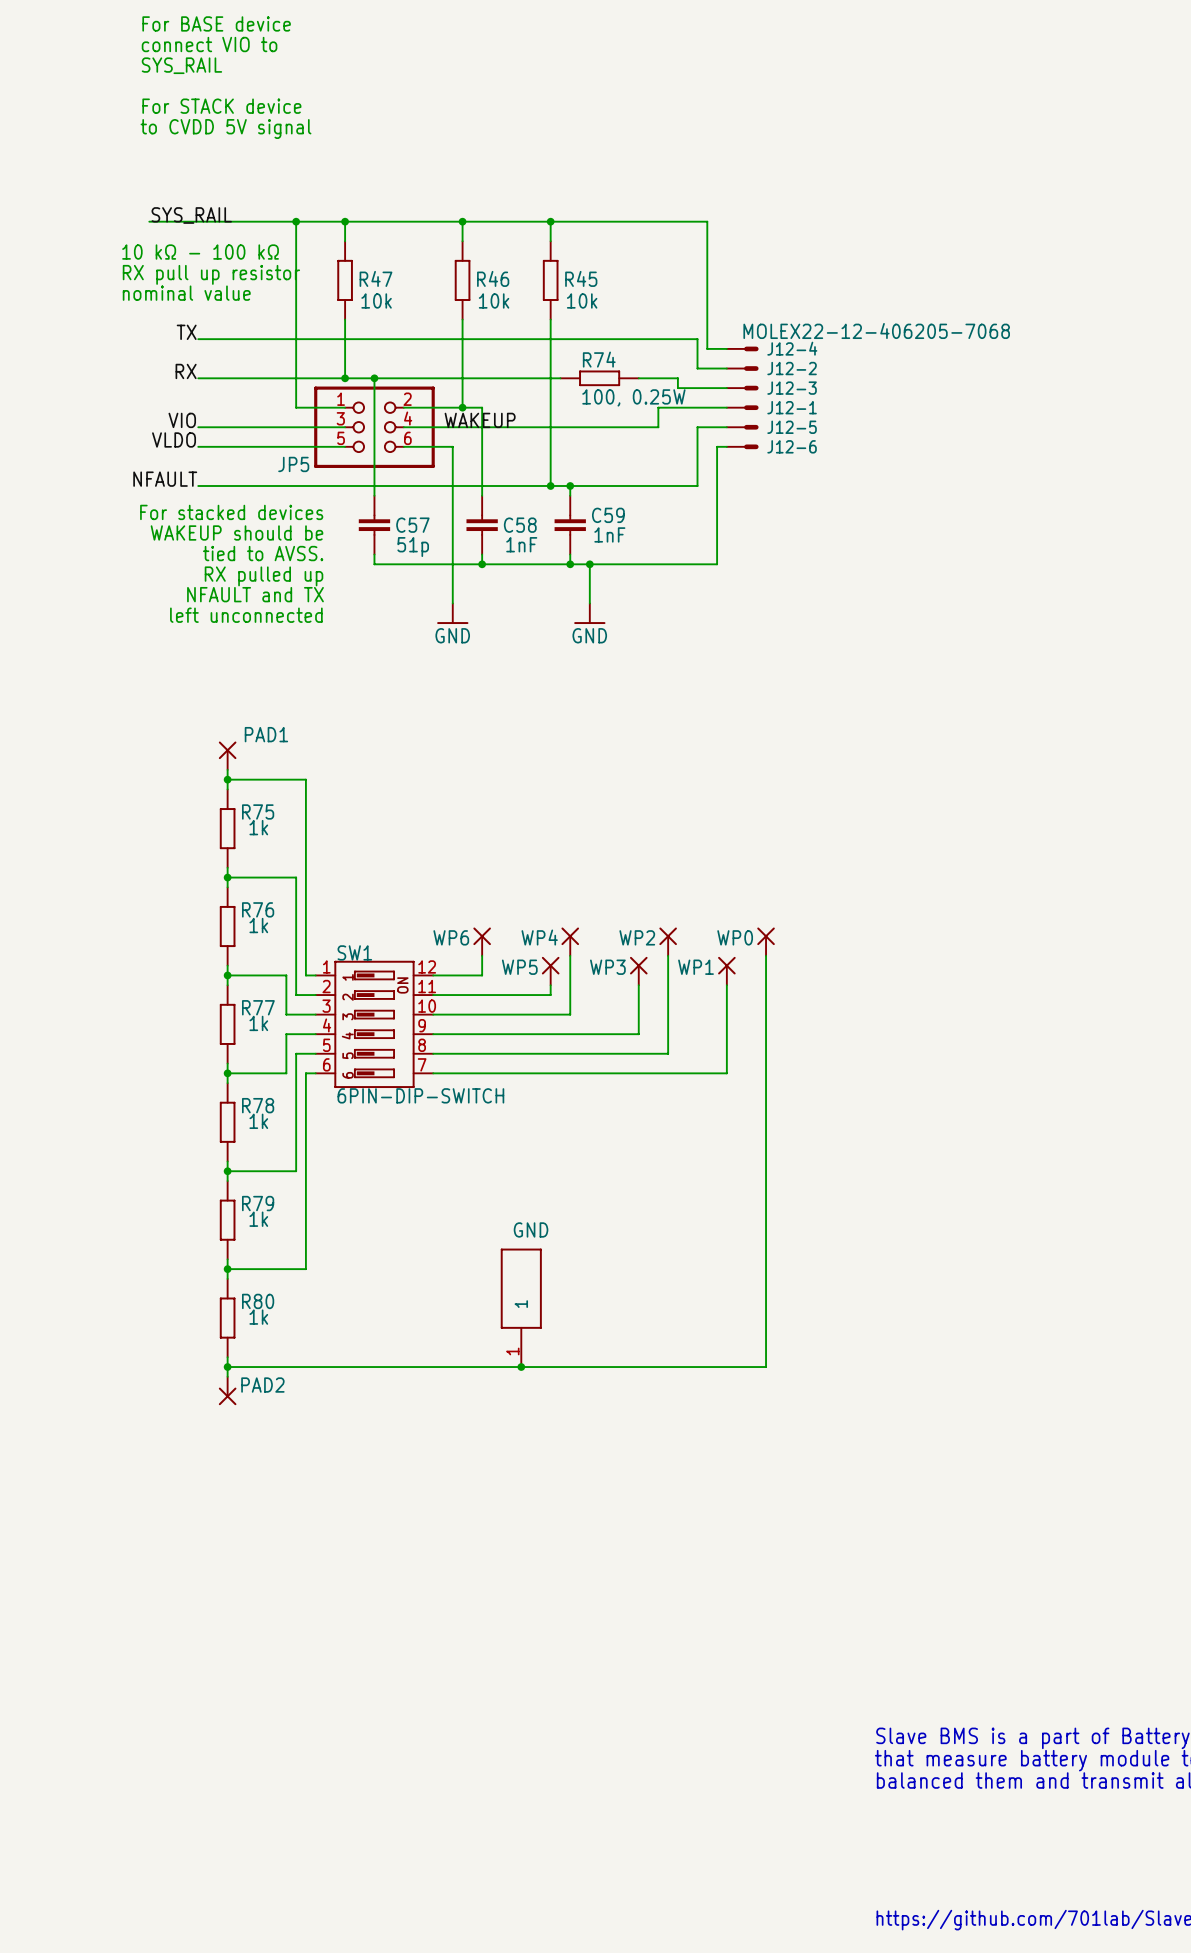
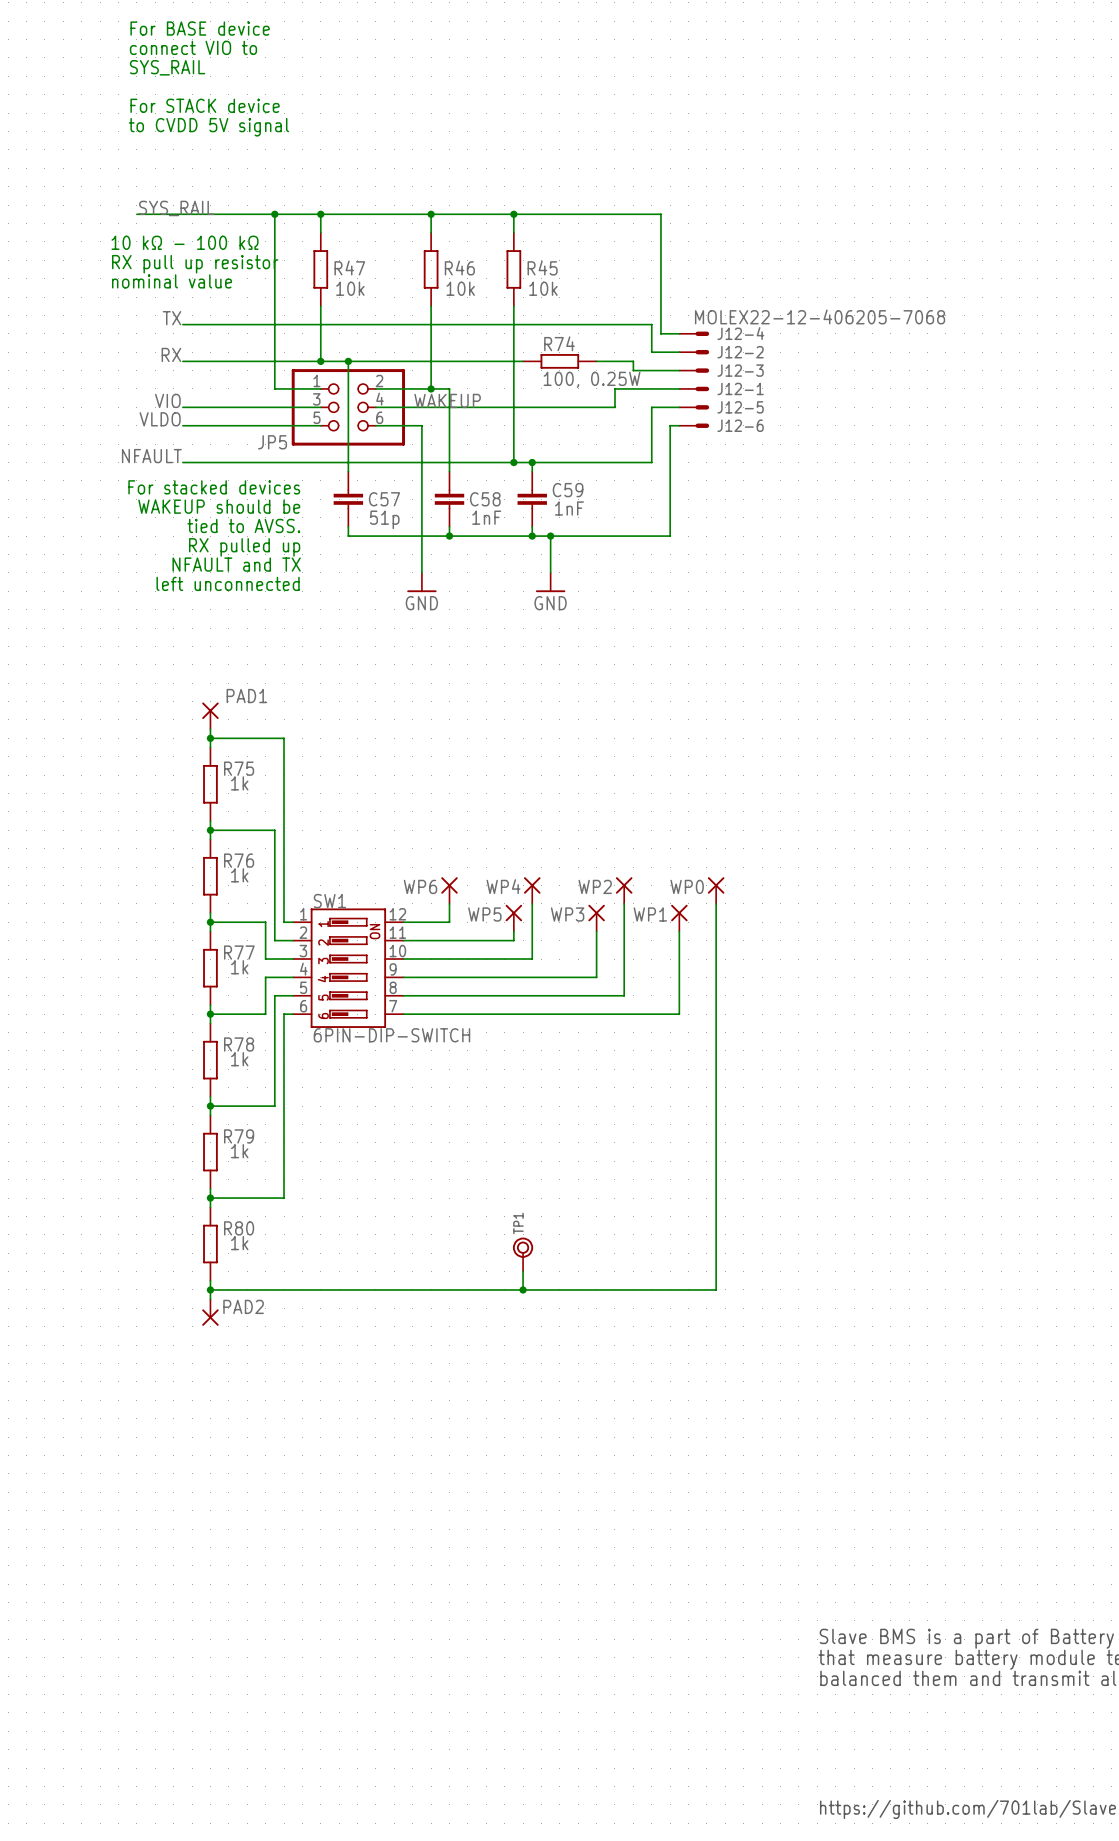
GND: (521, 1307) -> none
TP1: none -> (523, 1254)
wire: none -> (523, 1271) (523, 1289)
junction position: (521, 1367) -> (523, 1289)

